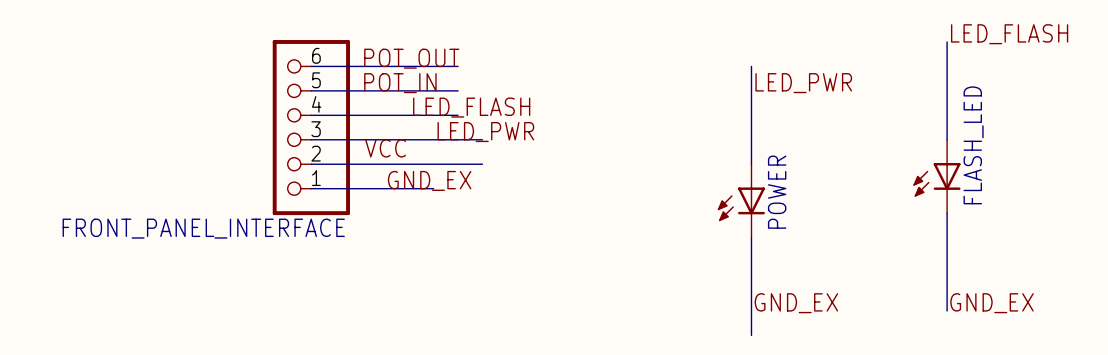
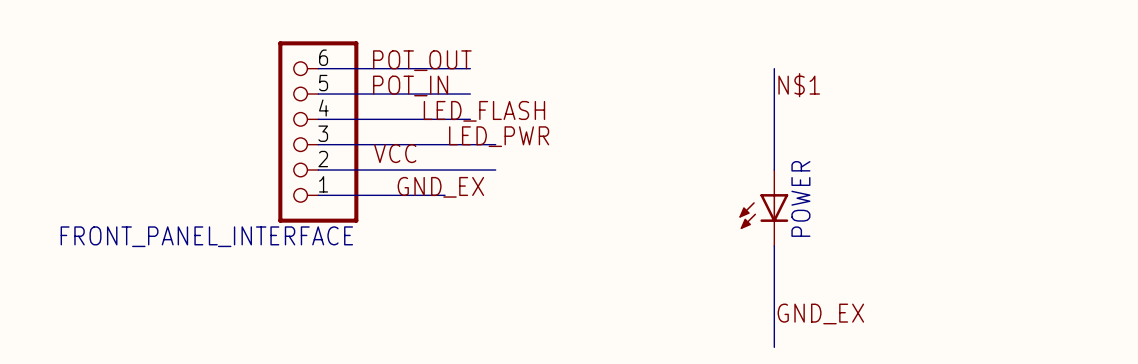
label: LED_FLASH (1009, 34) -> none
wire: (947, 41) (947, 139) -> none
label: LED_PWR (803, 83) -> N$1 (799, 85)
FLASH_LED: (936, 176) -> none
wire: (947, 213) (947, 310) -> none
label: GND_EX (992, 303) -> none

